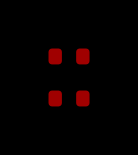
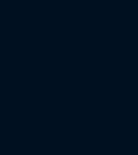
part: (69, 56) -> none
part: (69, 98) -> none

